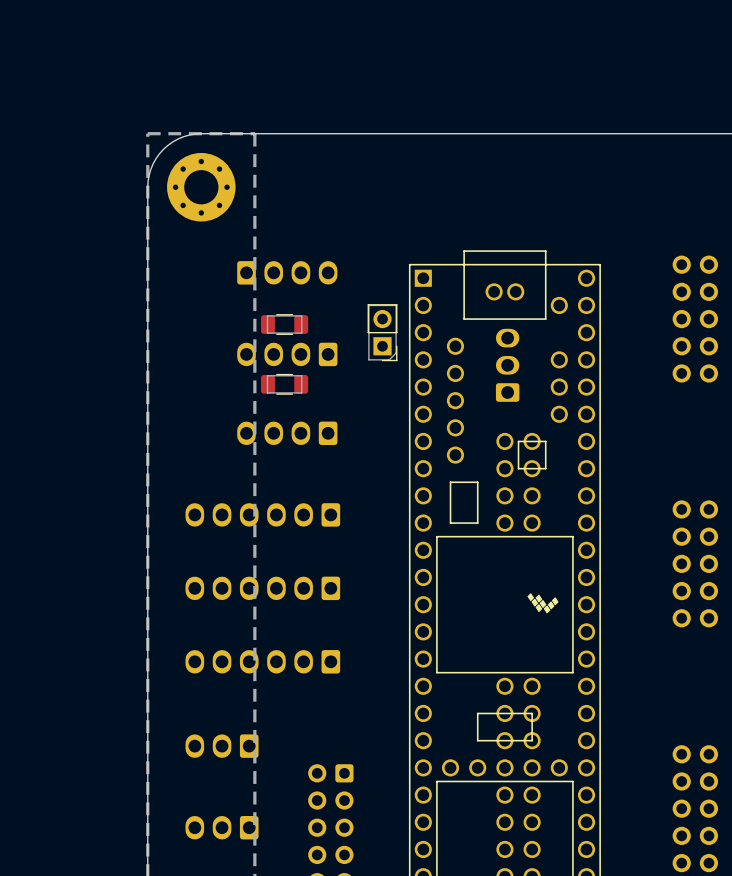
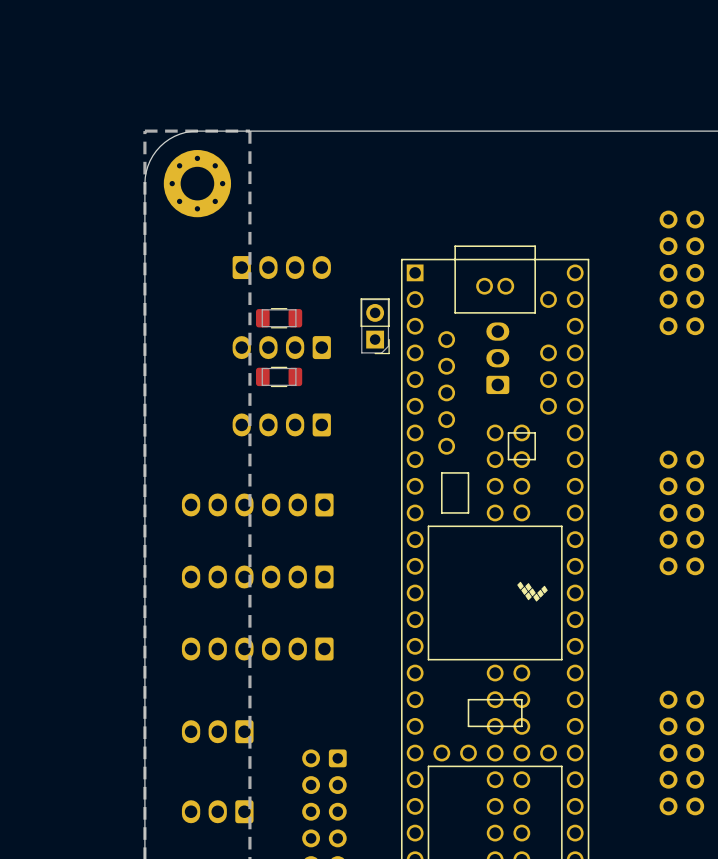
part position: (695, 319) -> (681, 272)
part position: (695, 563) -> (681, 512)
part position: (695, 808) -> (681, 753)

